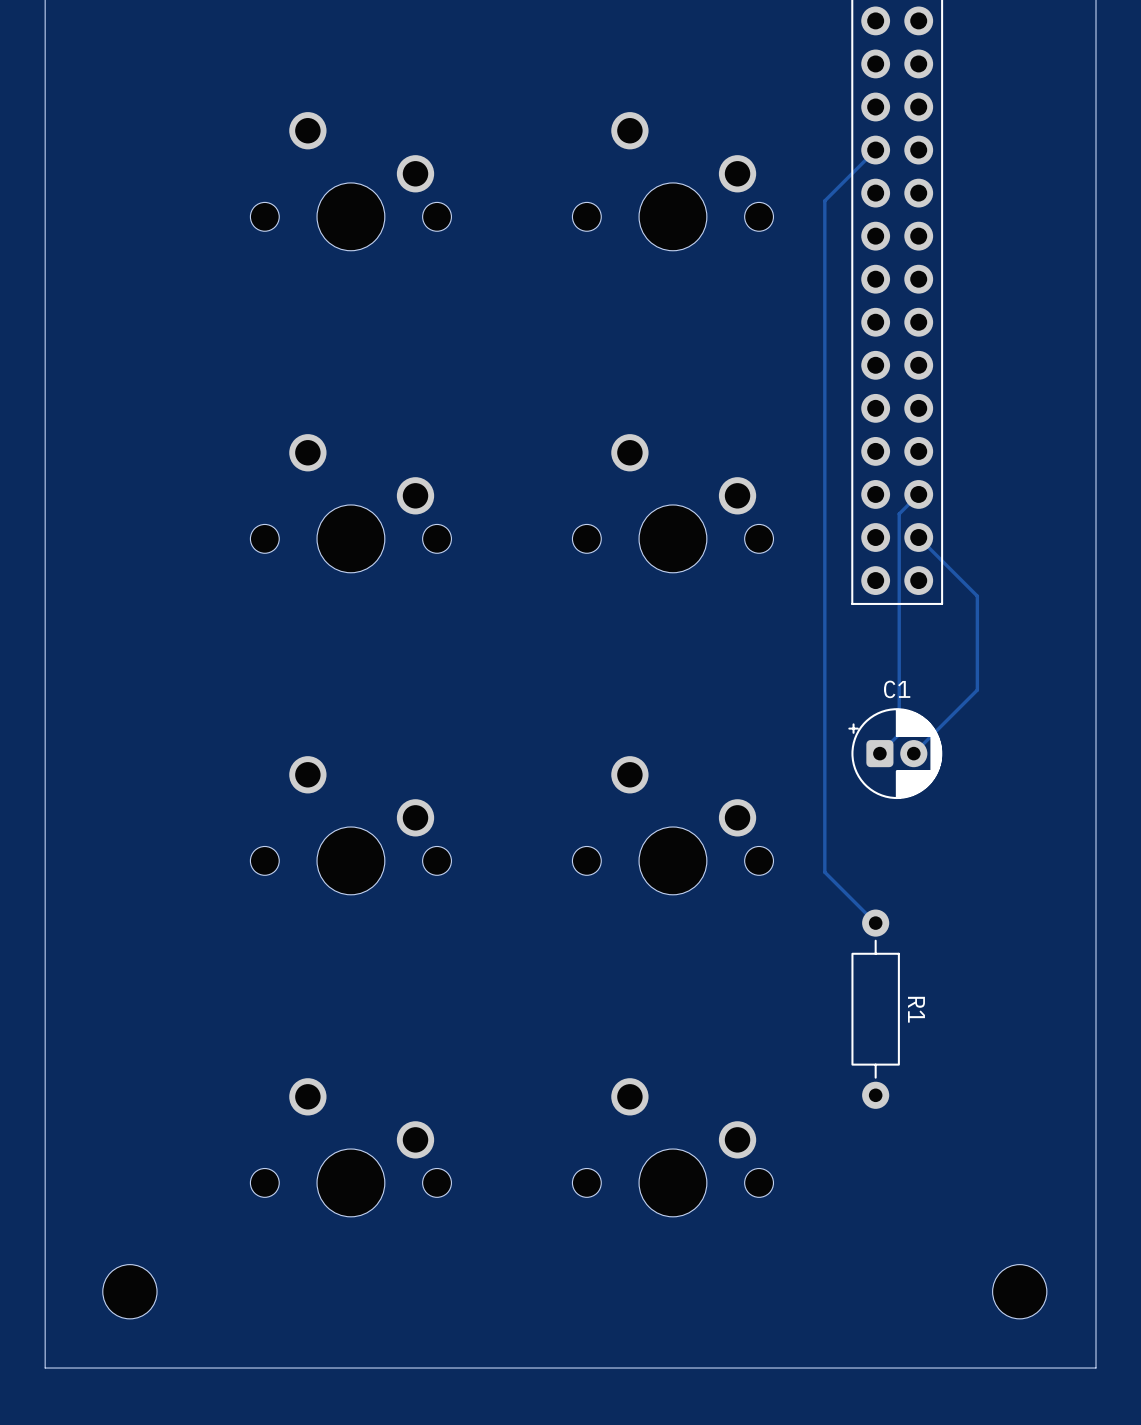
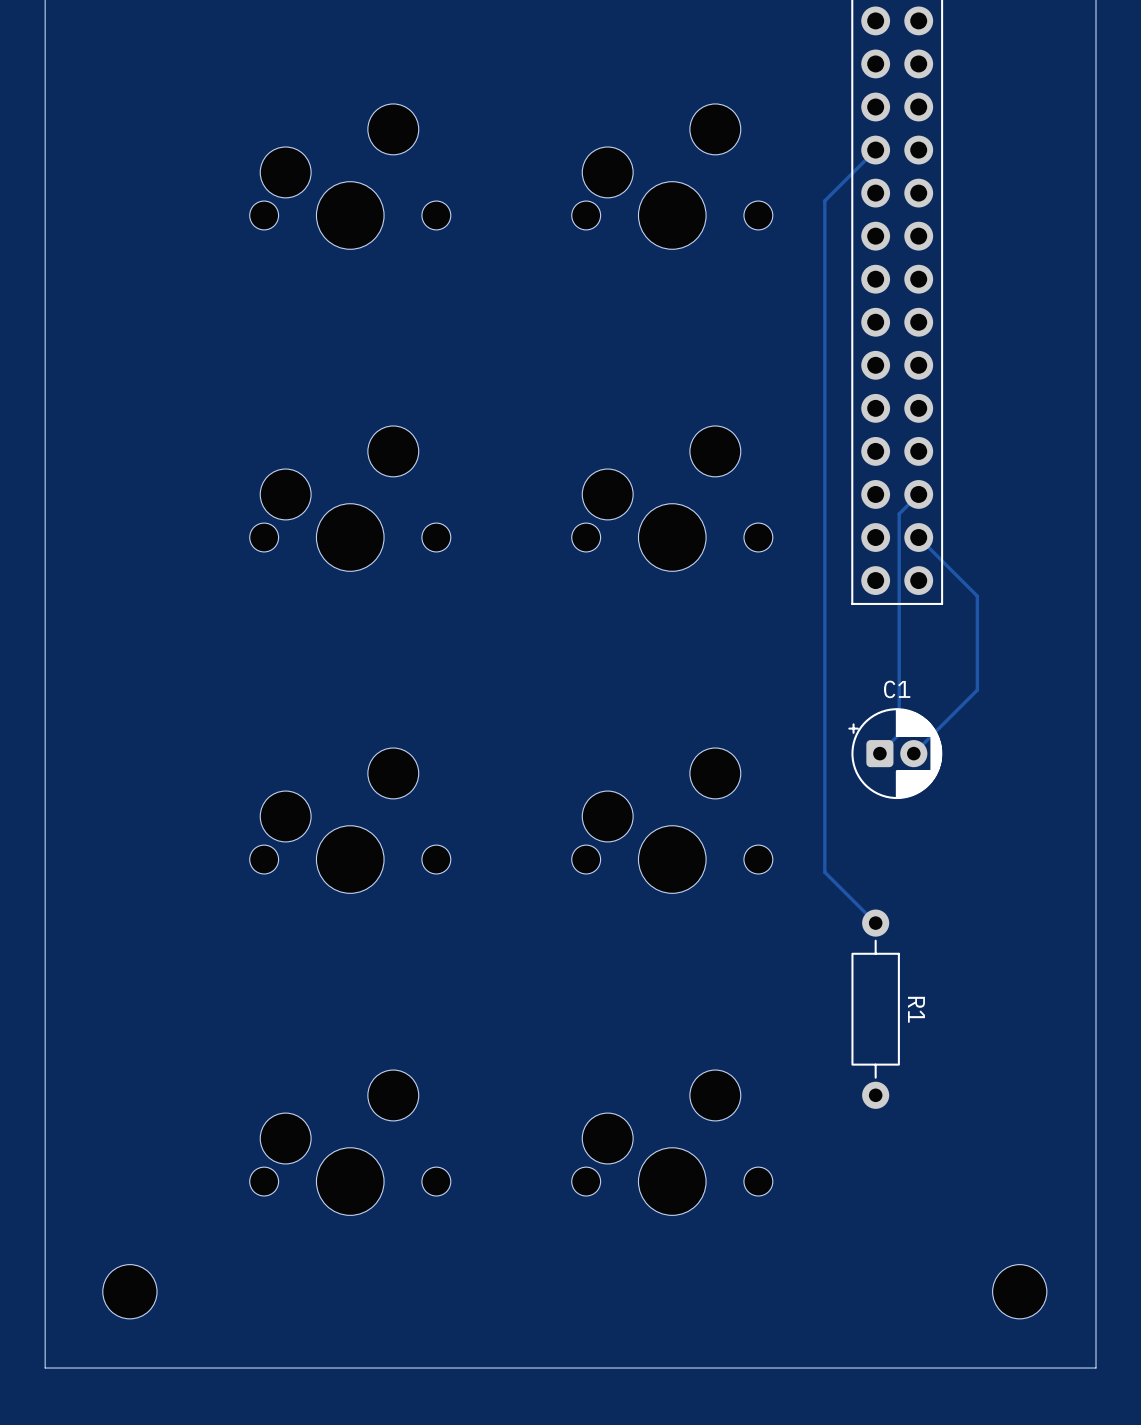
part footprint: [250, 112, 452, 251] -> [249, 103, 451, 250]
part footprint: [572, 112, 774, 251] -> [571, 103, 773, 250]
part footprint: [250, 434, 452, 573] -> [249, 425, 451, 572]
part footprint: [572, 434, 774, 573] -> [571, 425, 773, 572]
part footprint: [250, 756, 452, 895] -> [249, 748, 451, 894]
part footprint: [572, 756, 774, 895] -> [571, 748, 773, 894]
part footprint: [250, 1078, 452, 1217] -> [249, 1070, 451, 1216]
part footprint: [572, 1078, 774, 1217] -> [571, 1070, 773, 1216]

